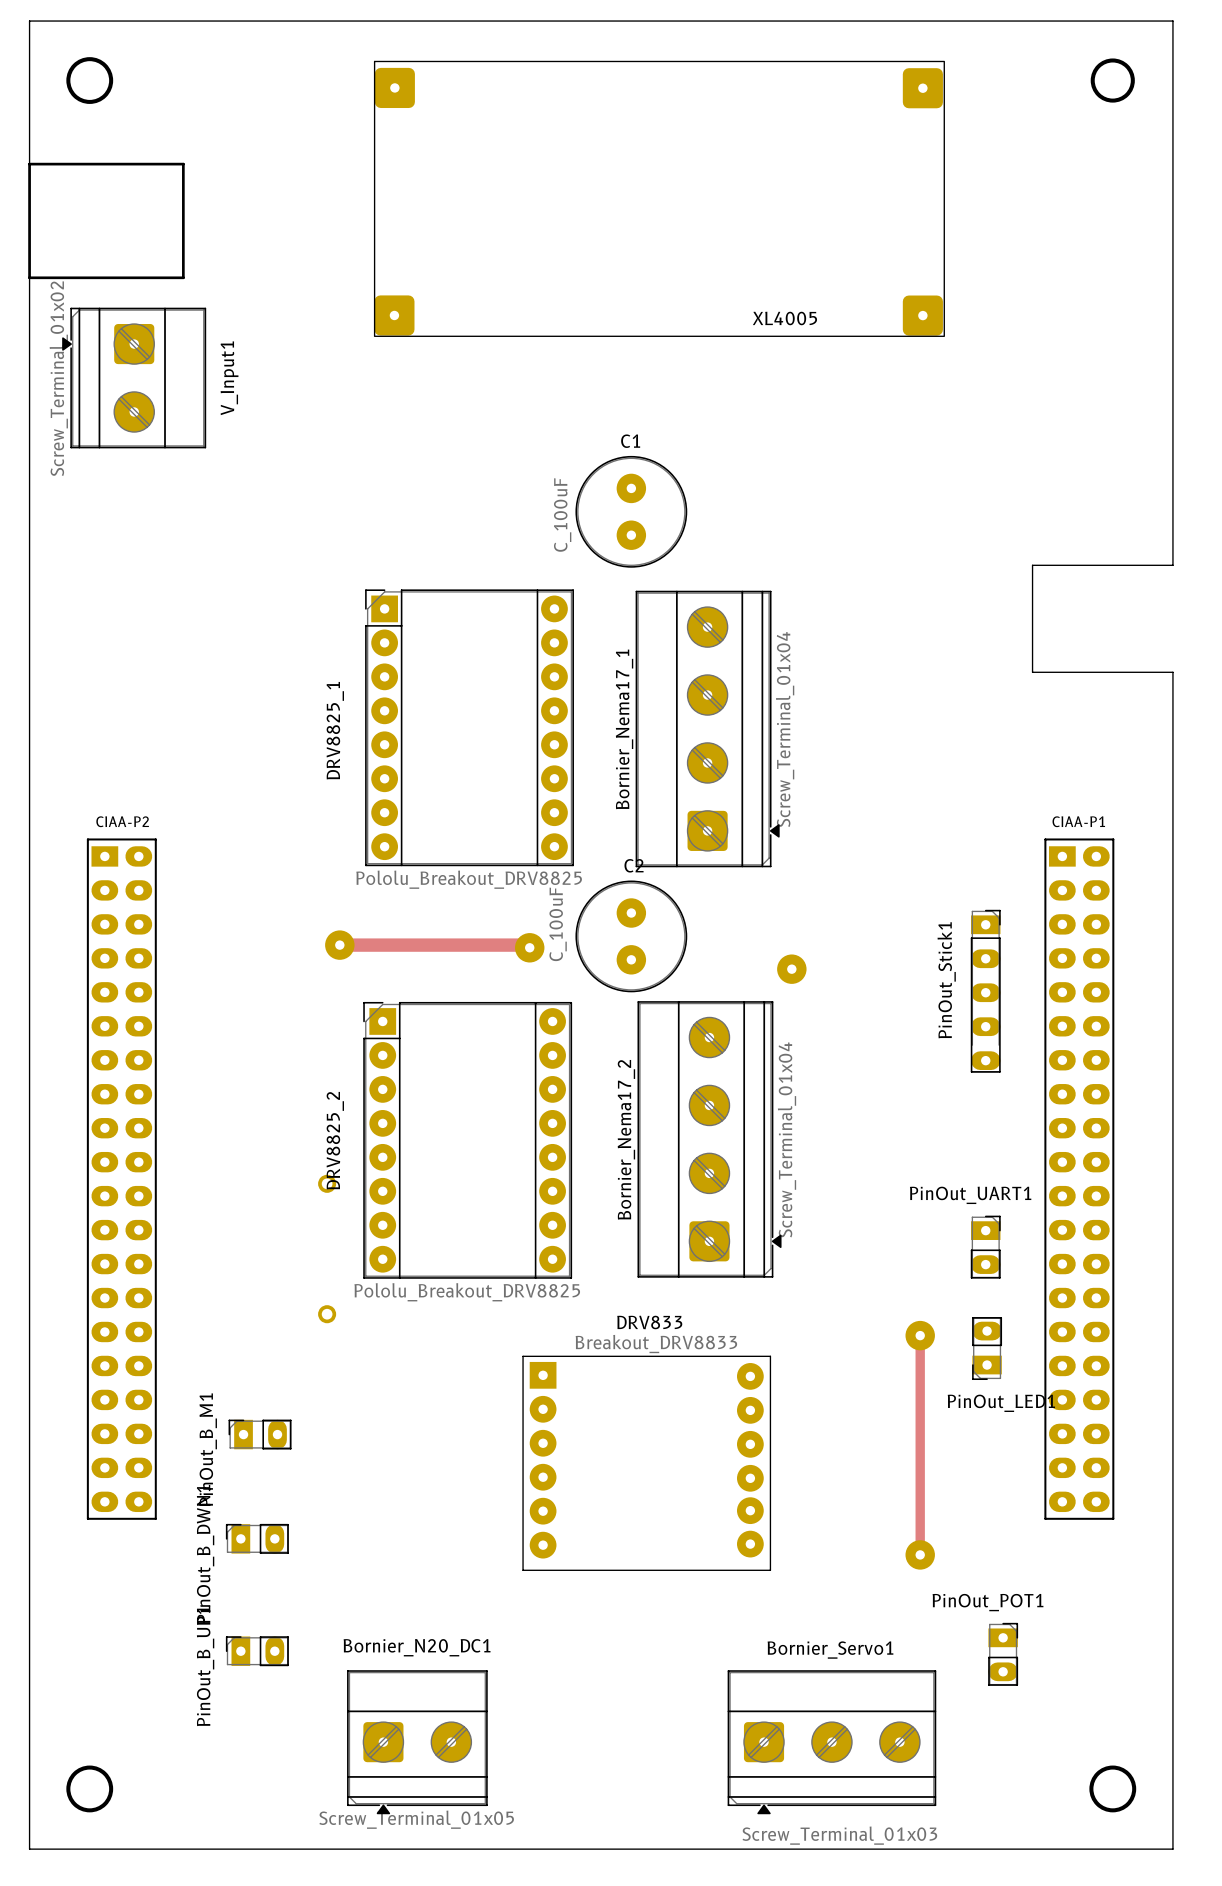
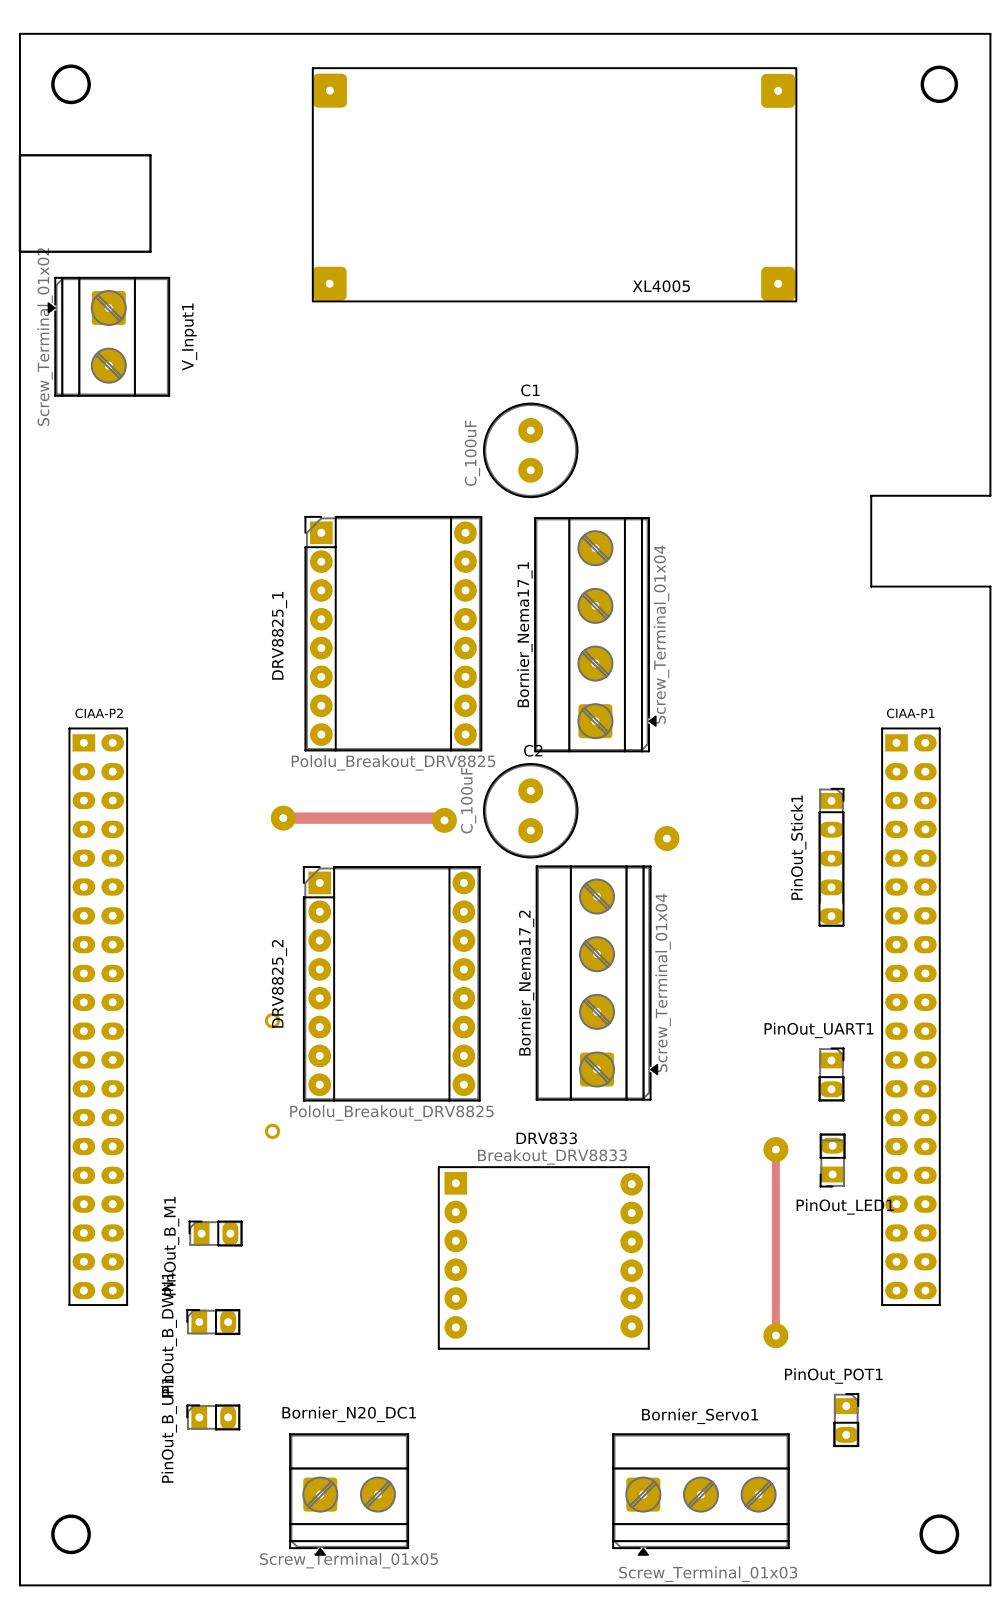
PinOut_LED1 footprint: [972, 1317, 1003, 1381] -> [819, 1133, 846, 1188]

